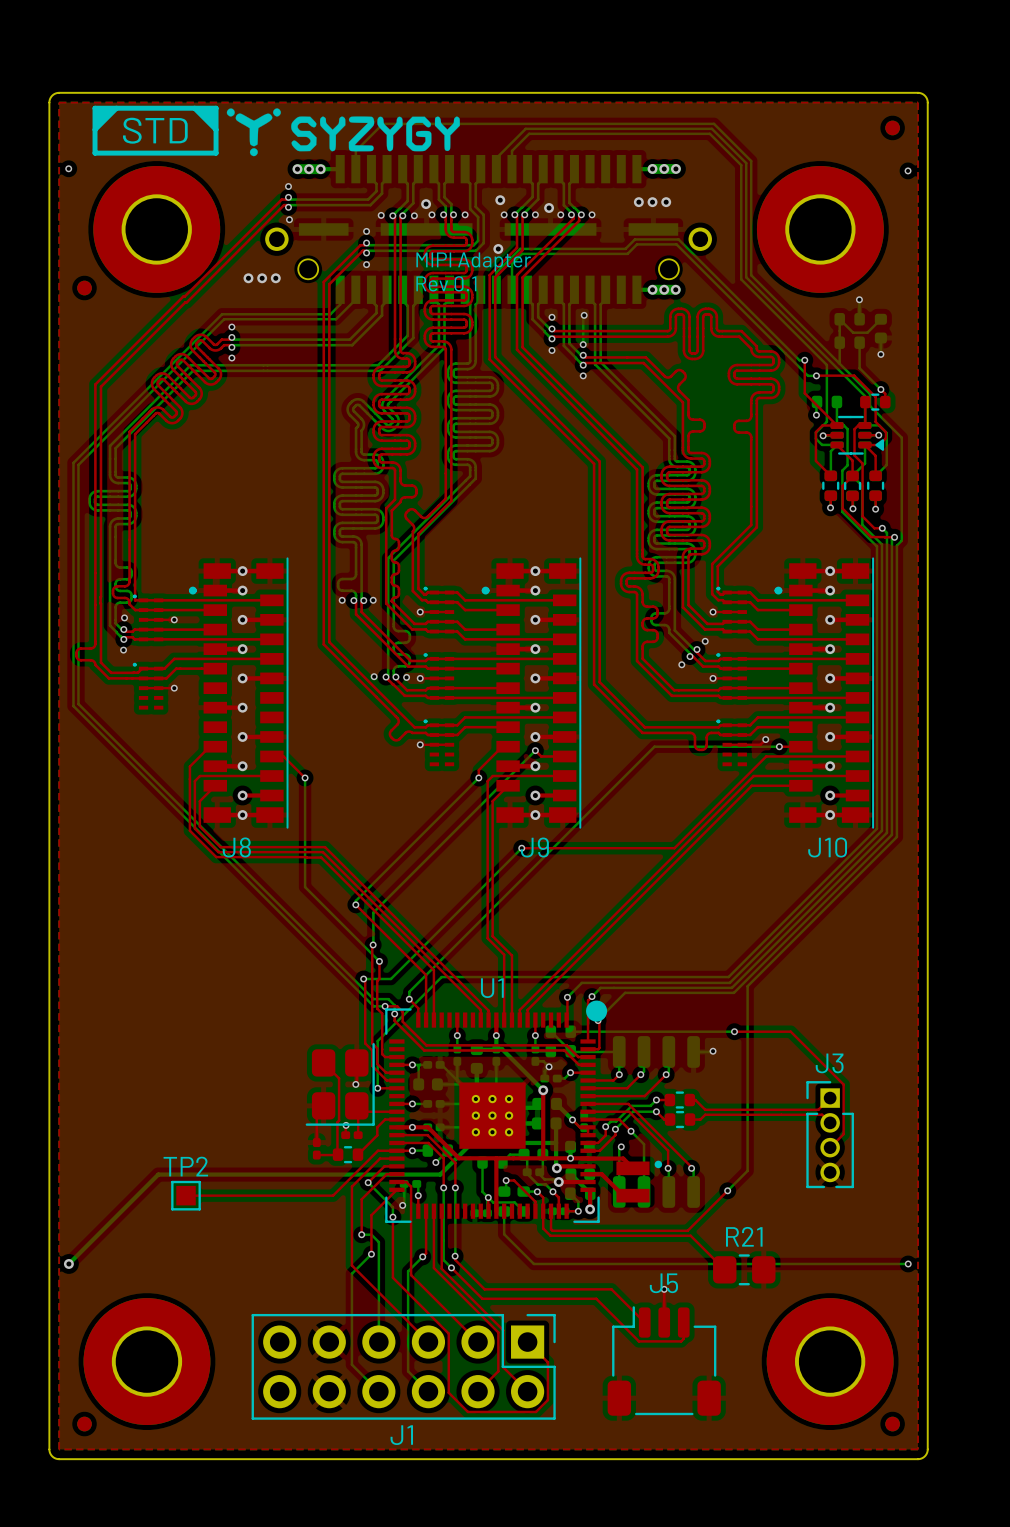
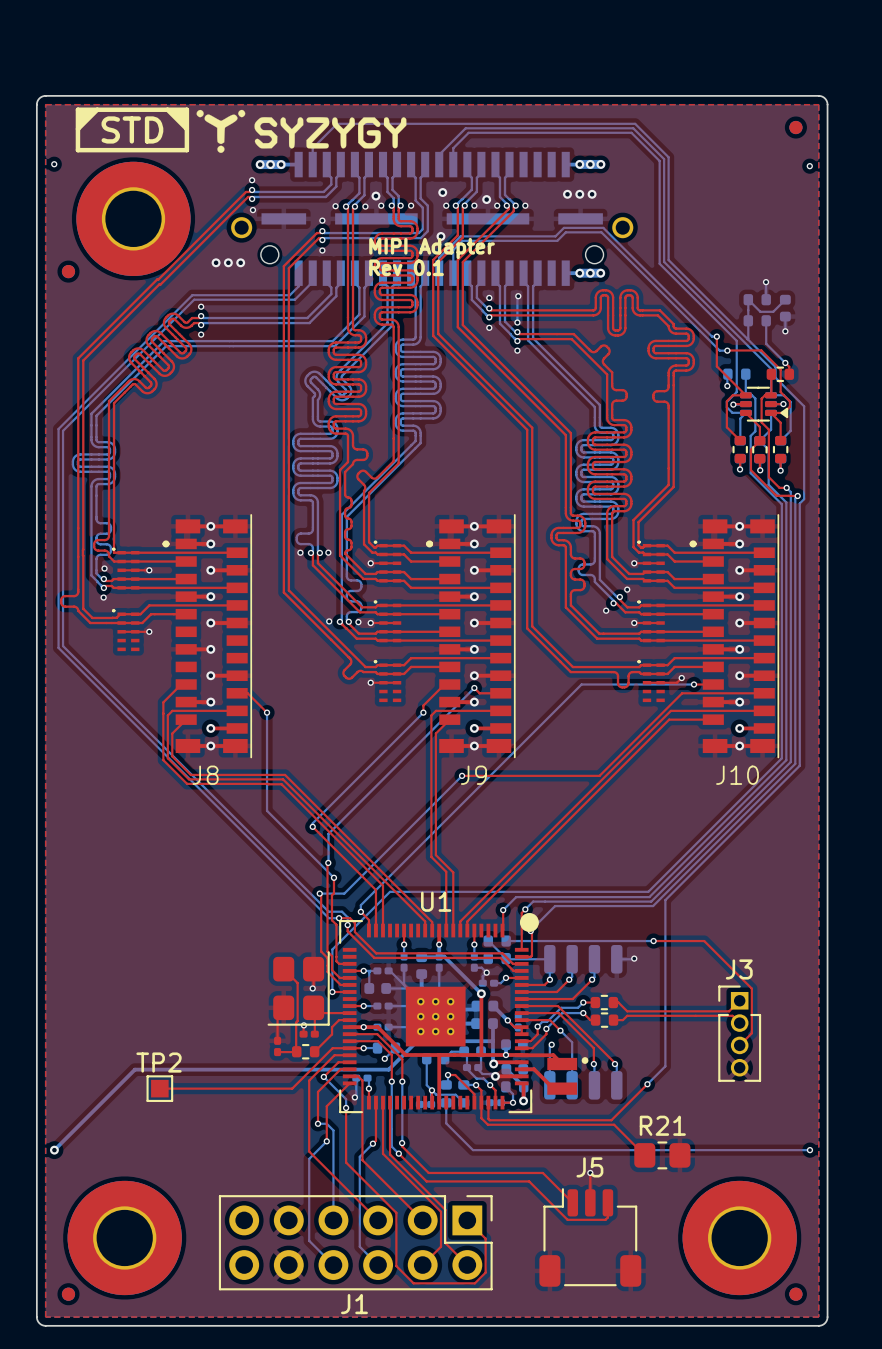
part: (820, 229) -> none

